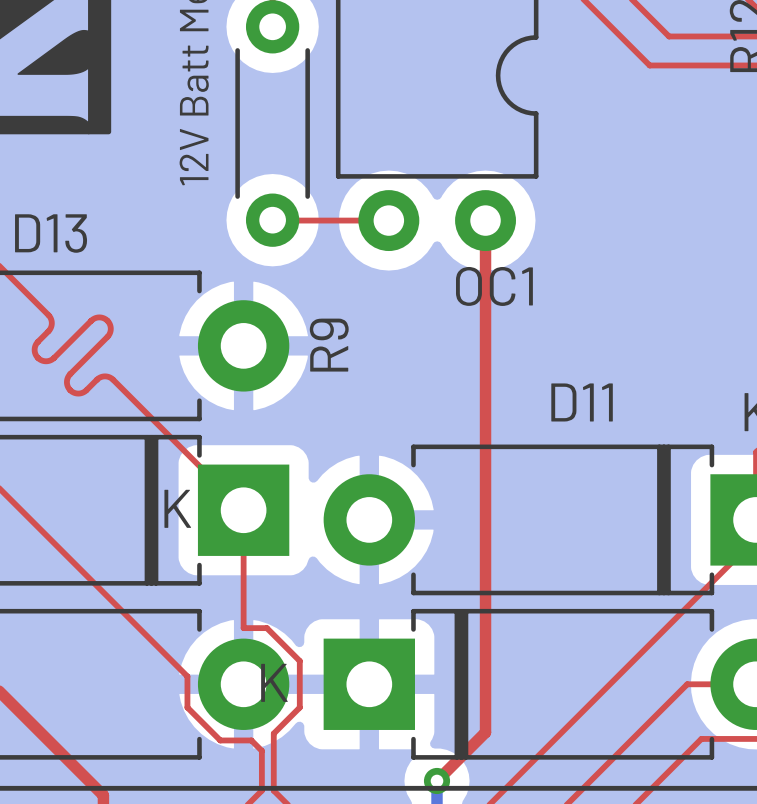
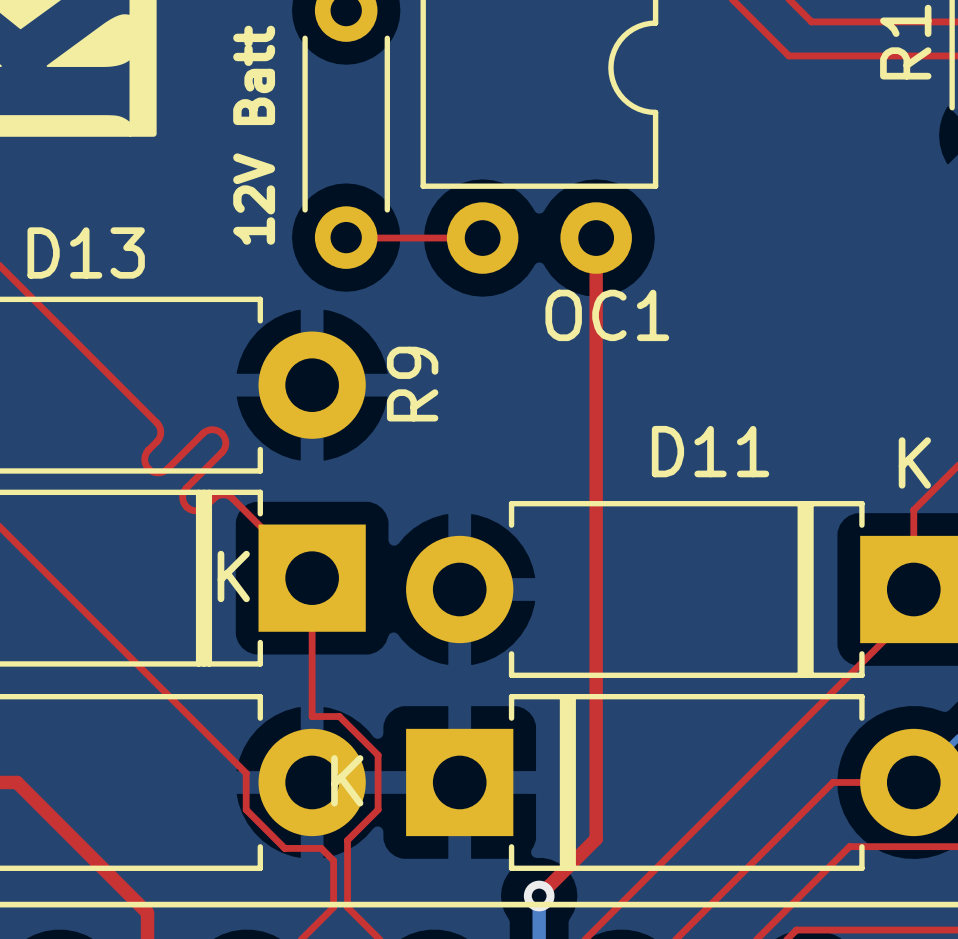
top track: (48, 315) (51, 320) (51, 326) (36, 342) (34, 348) (36, 356) (44, 361) (53, 358) (93, 319) (103, 318) (110, 325) (108, 335) (68, 376) (67, 383) (70, 390) (75, 393) (82, 392) (98, 378) (109, 377) (175, 442) -> (83, 349) (158, 425) (160, 432) (159, 438) (147, 451) (144, 457) (145, 464) (151, 470) (158, 472) (166, 469) (206, 431) (215, 430) (223, 435) (225, 444) (222, 451) (184, 491) (183, 500) (186, 506) (193, 510) (200, 510) (220, 495) (227, 495) (232, 498)

